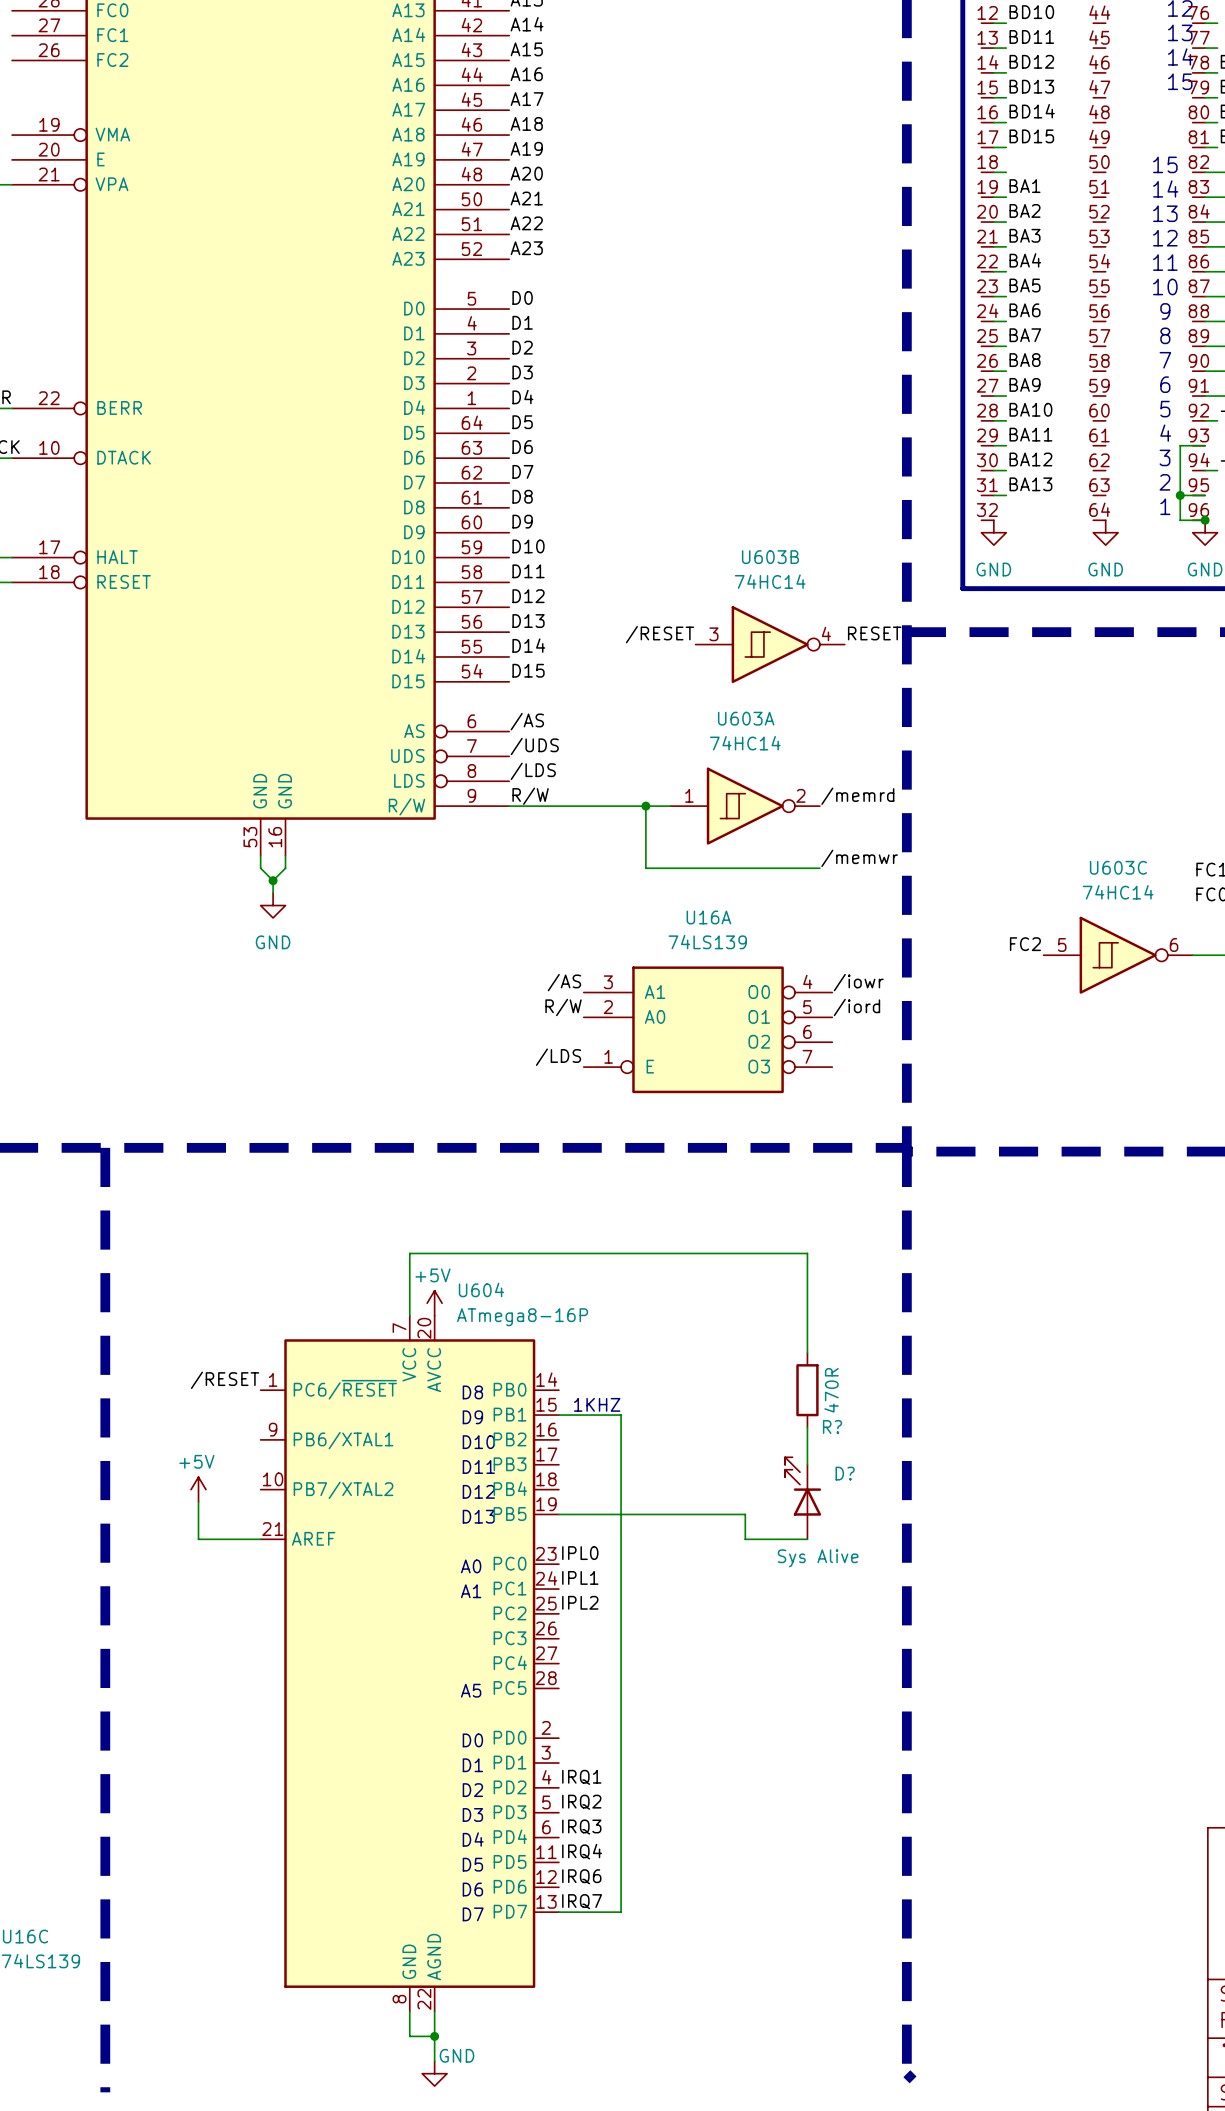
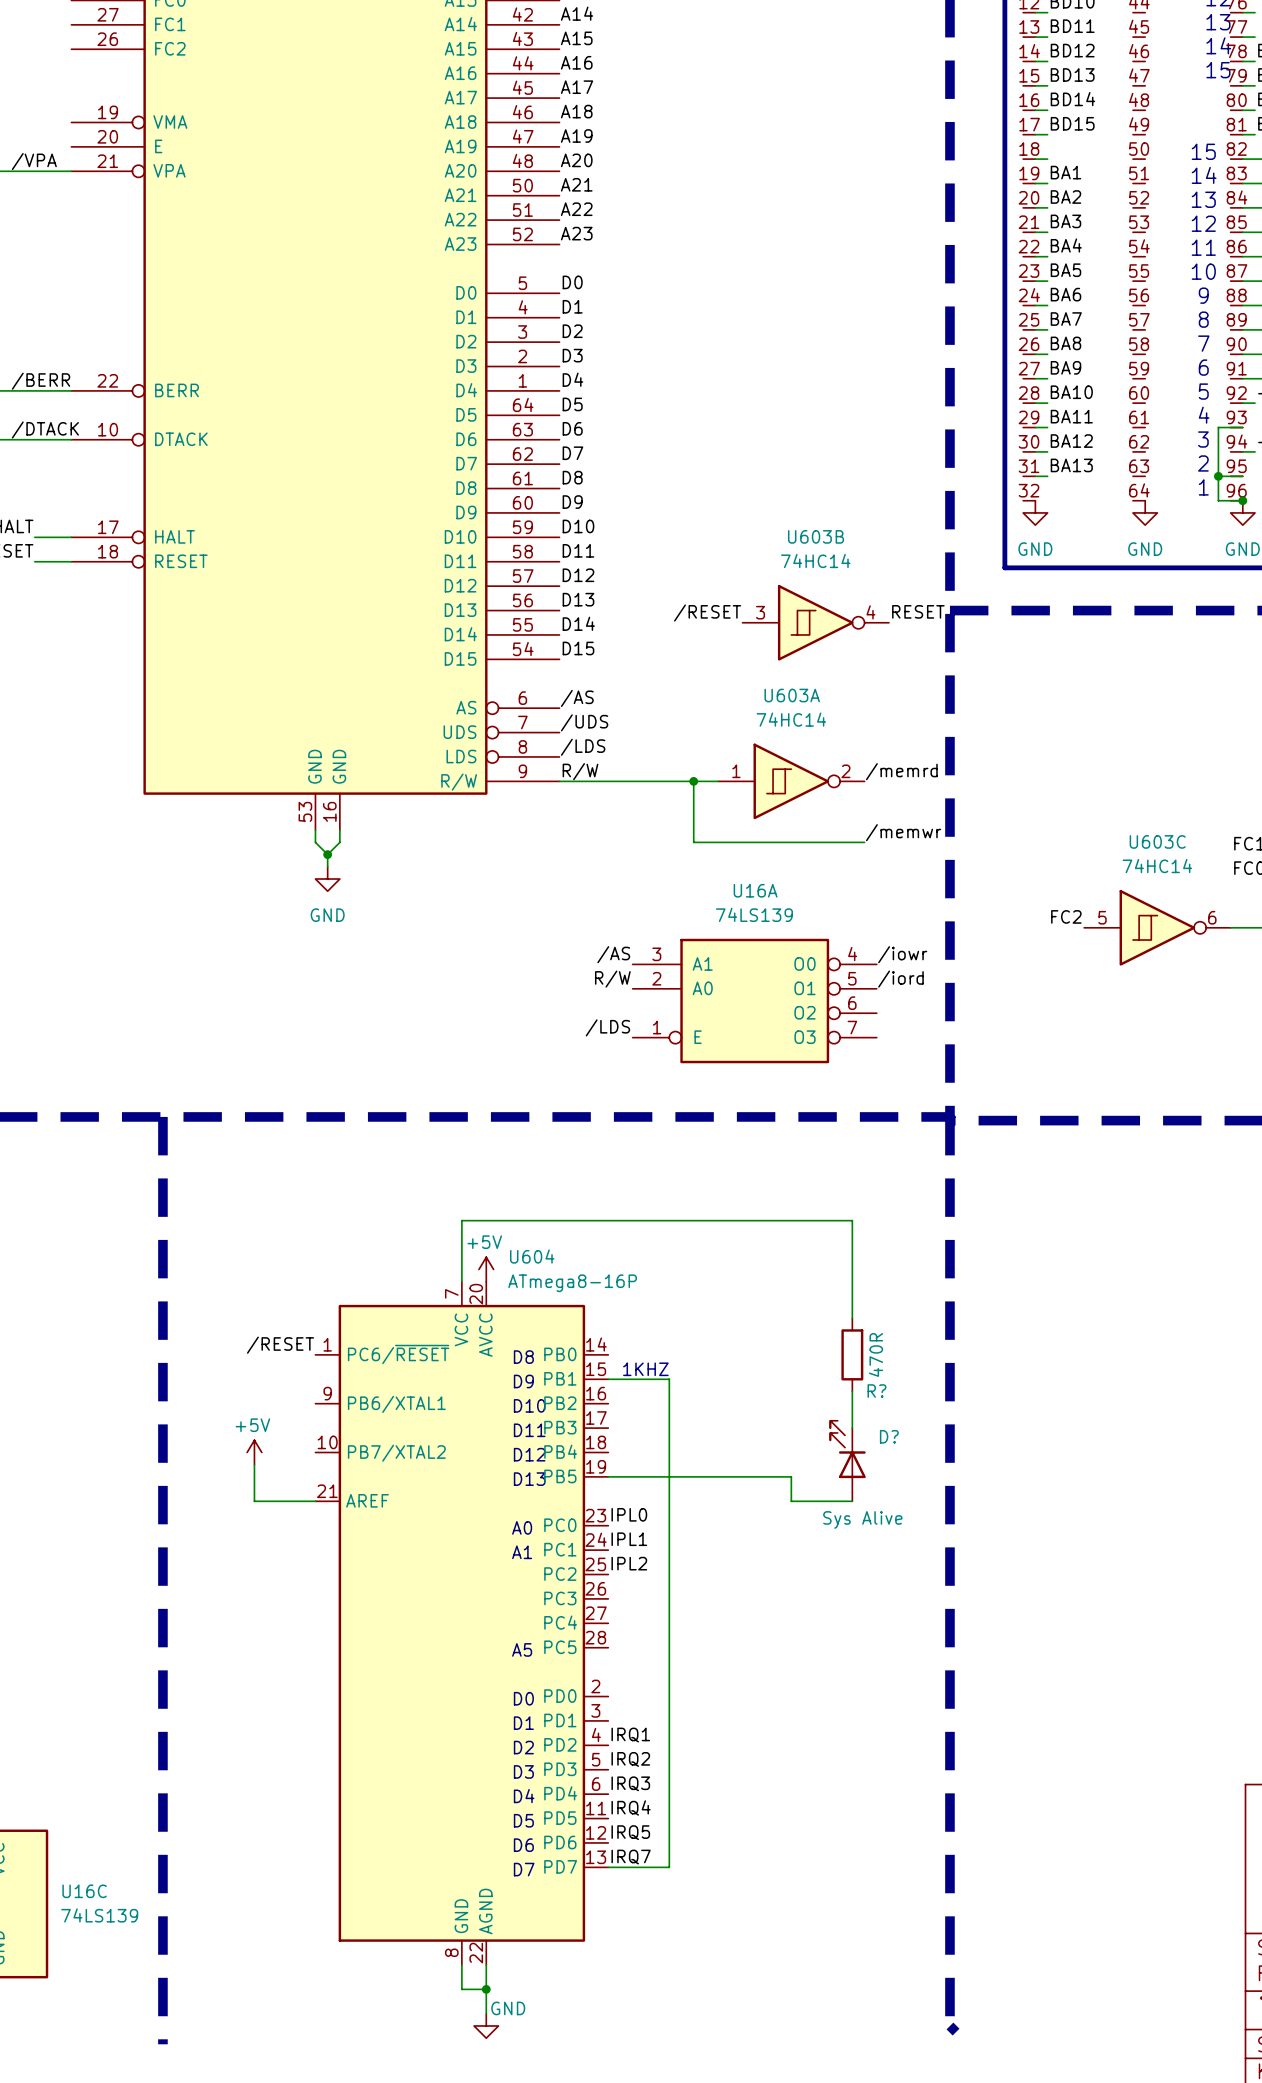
label: IRQ6 (581, 1876) -> IRQ5 (630, 1832)

